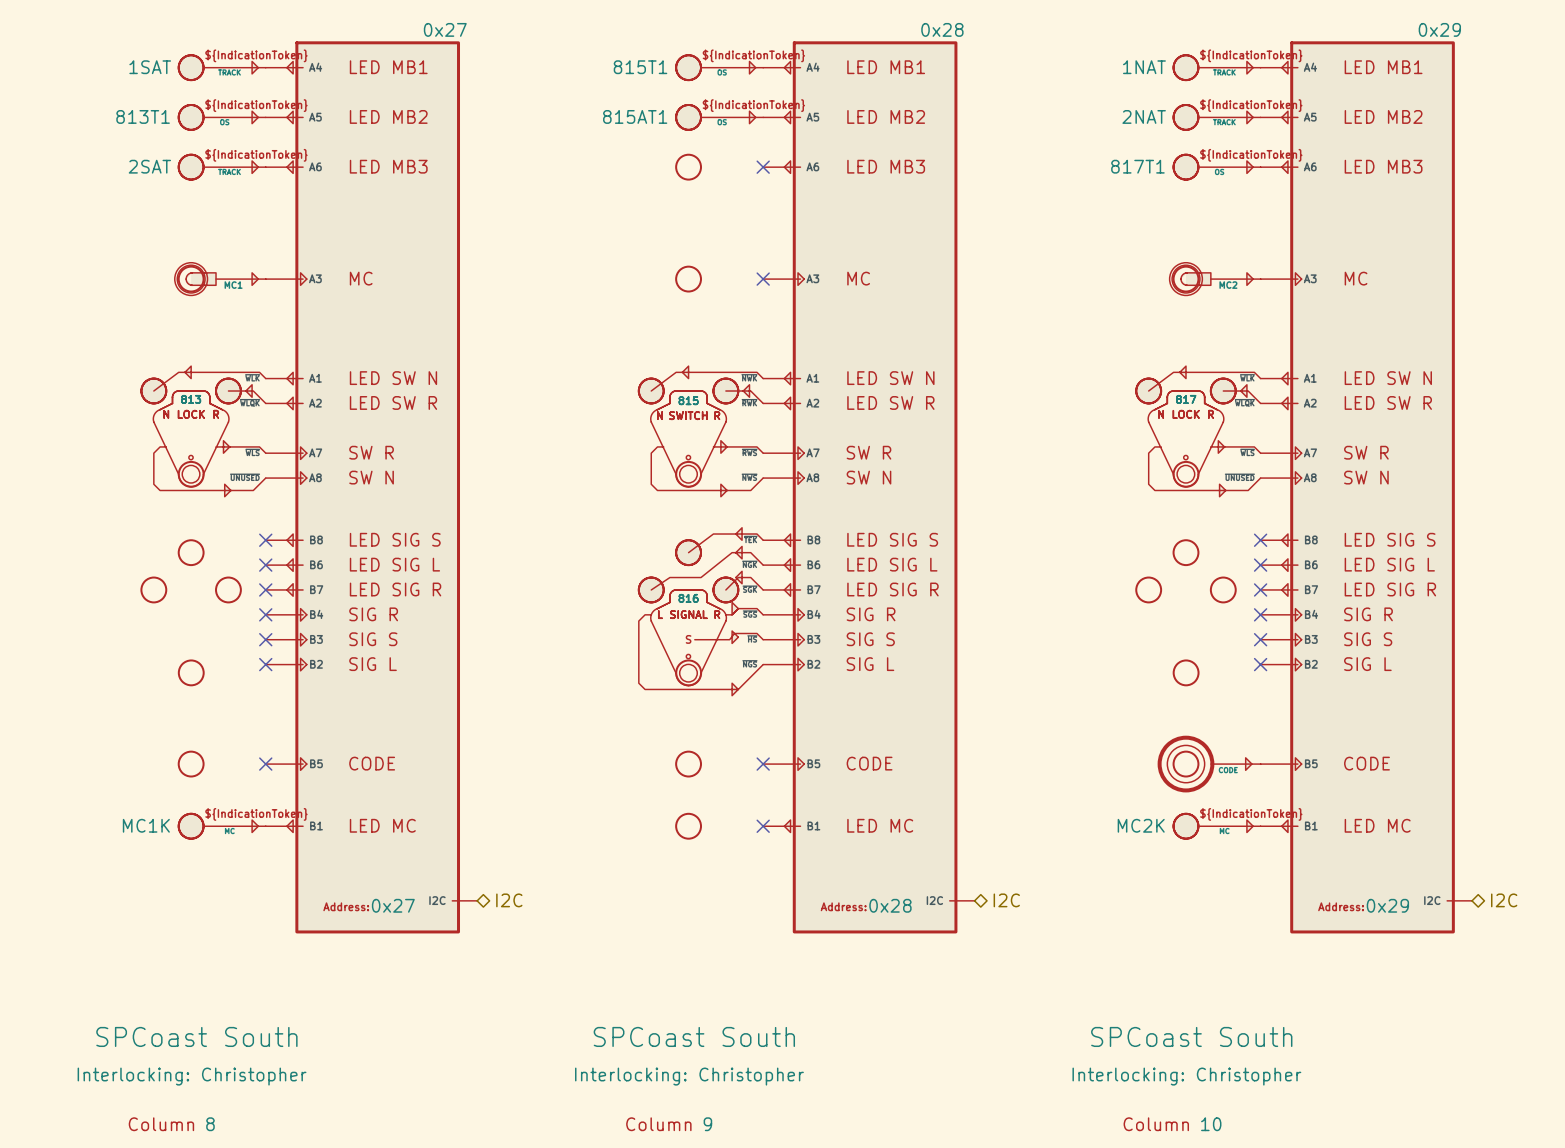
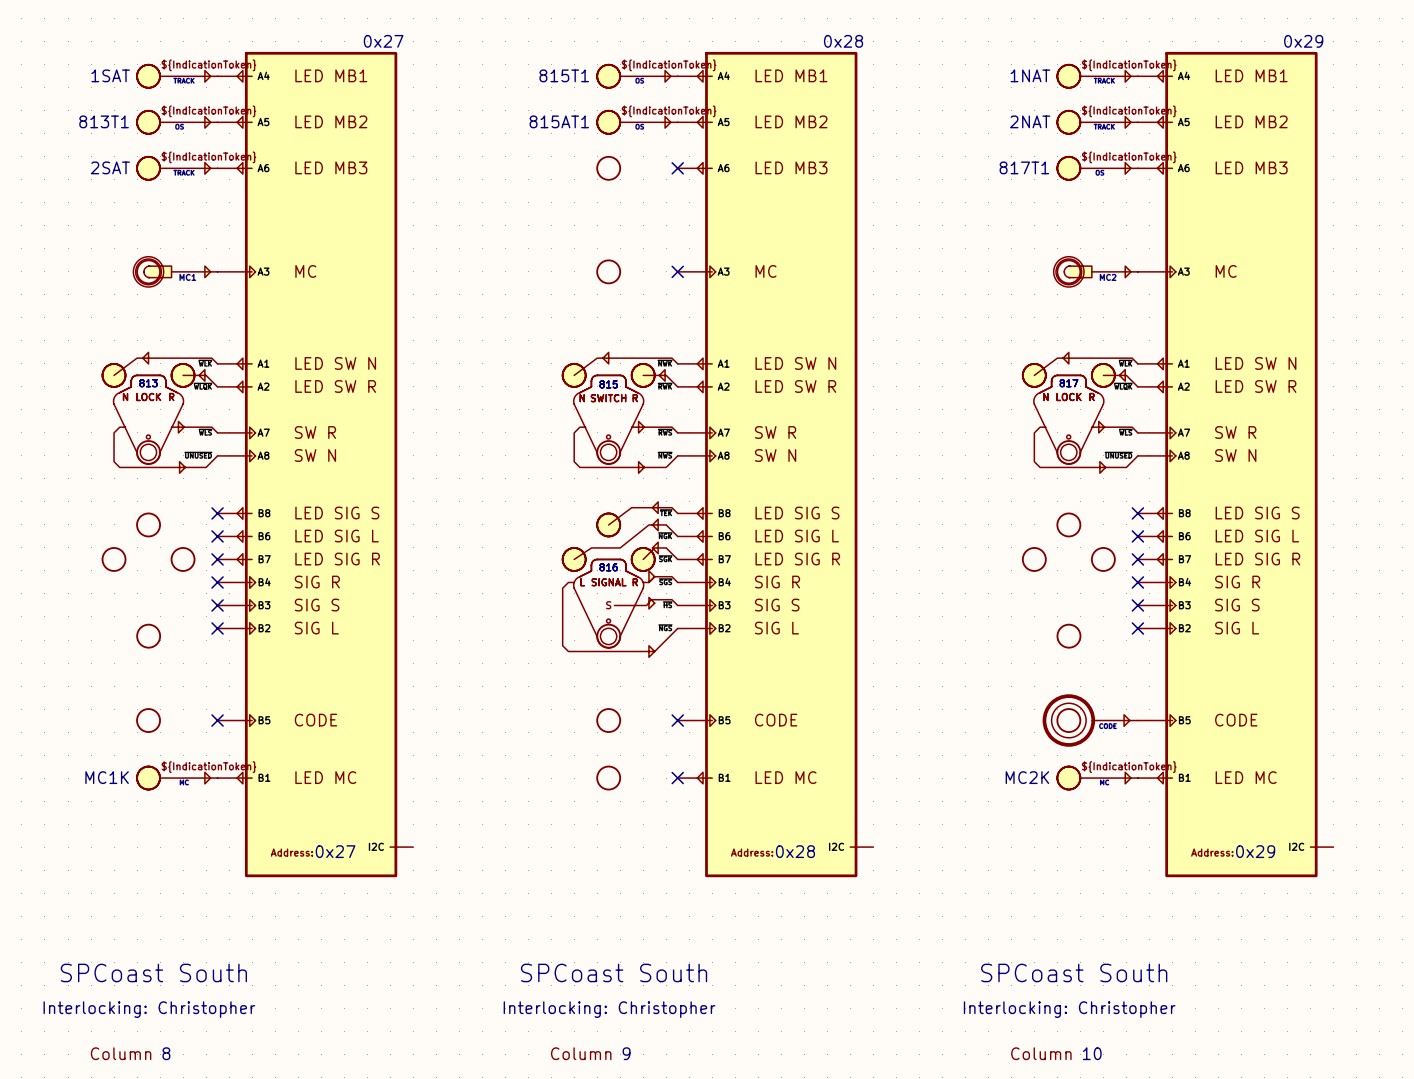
hierarchical label: I2C (509, 900) -> none
hierarchical label: I2C (1006, 900) -> none
hierarchical label: I2C (1504, 900) -> none

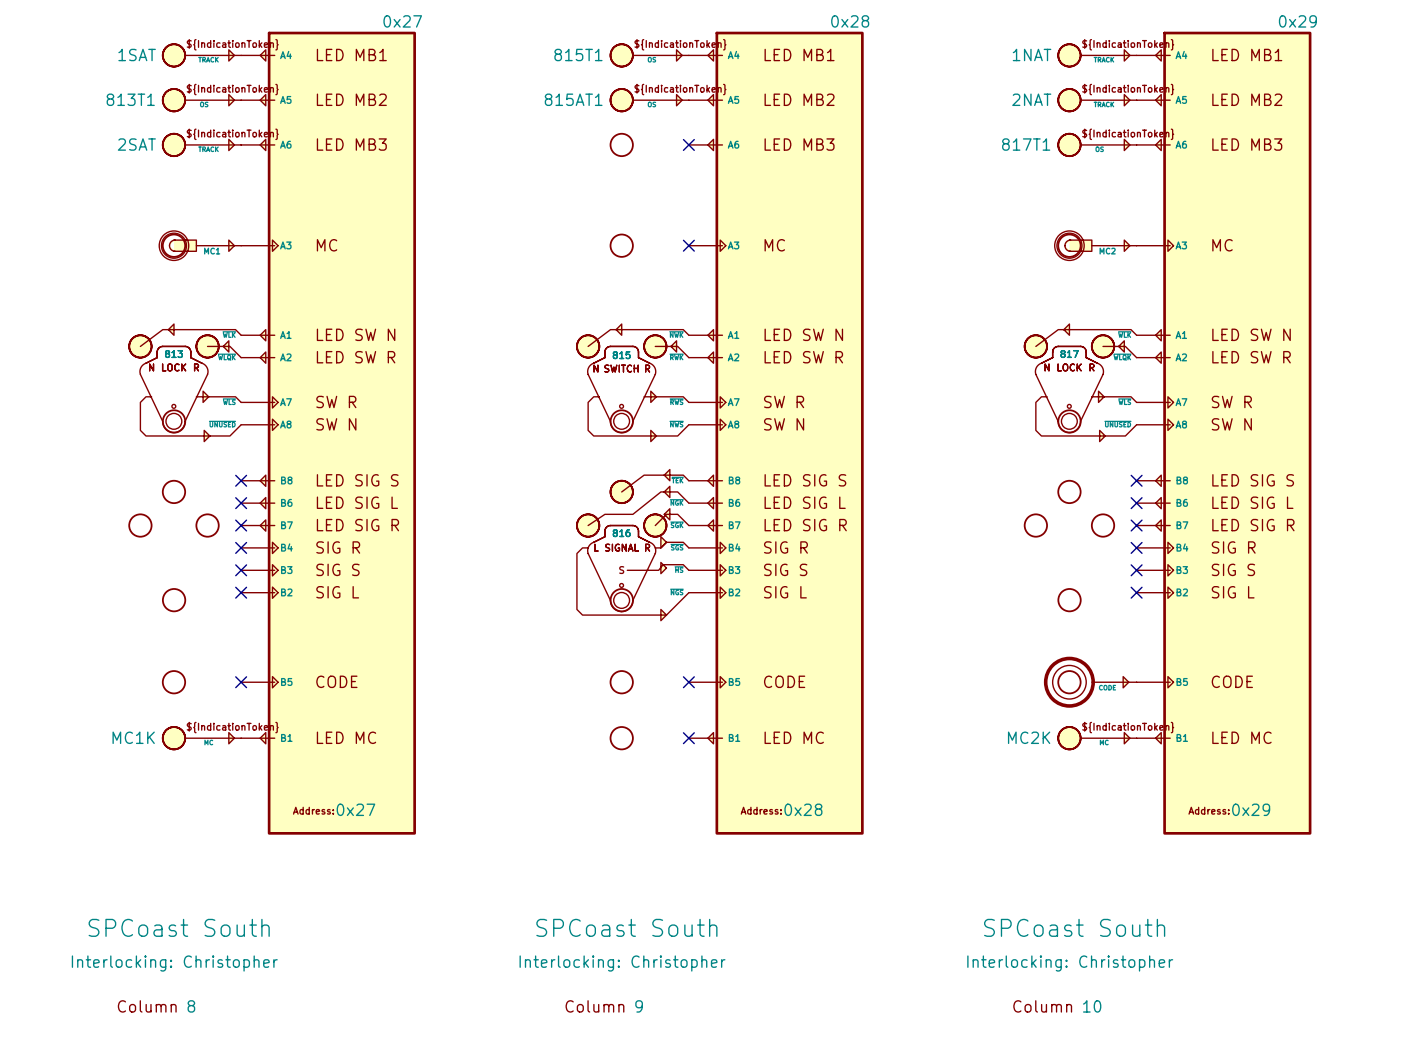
part symbol: [217, 51, 414, 878] -> [241, 31, 416, 835]
part symbol: [677, 51, 874, 878] -> [688, 31, 864, 835]
part symbol: [1137, 51, 1334, 878] -> [1136, 31, 1312, 835]

